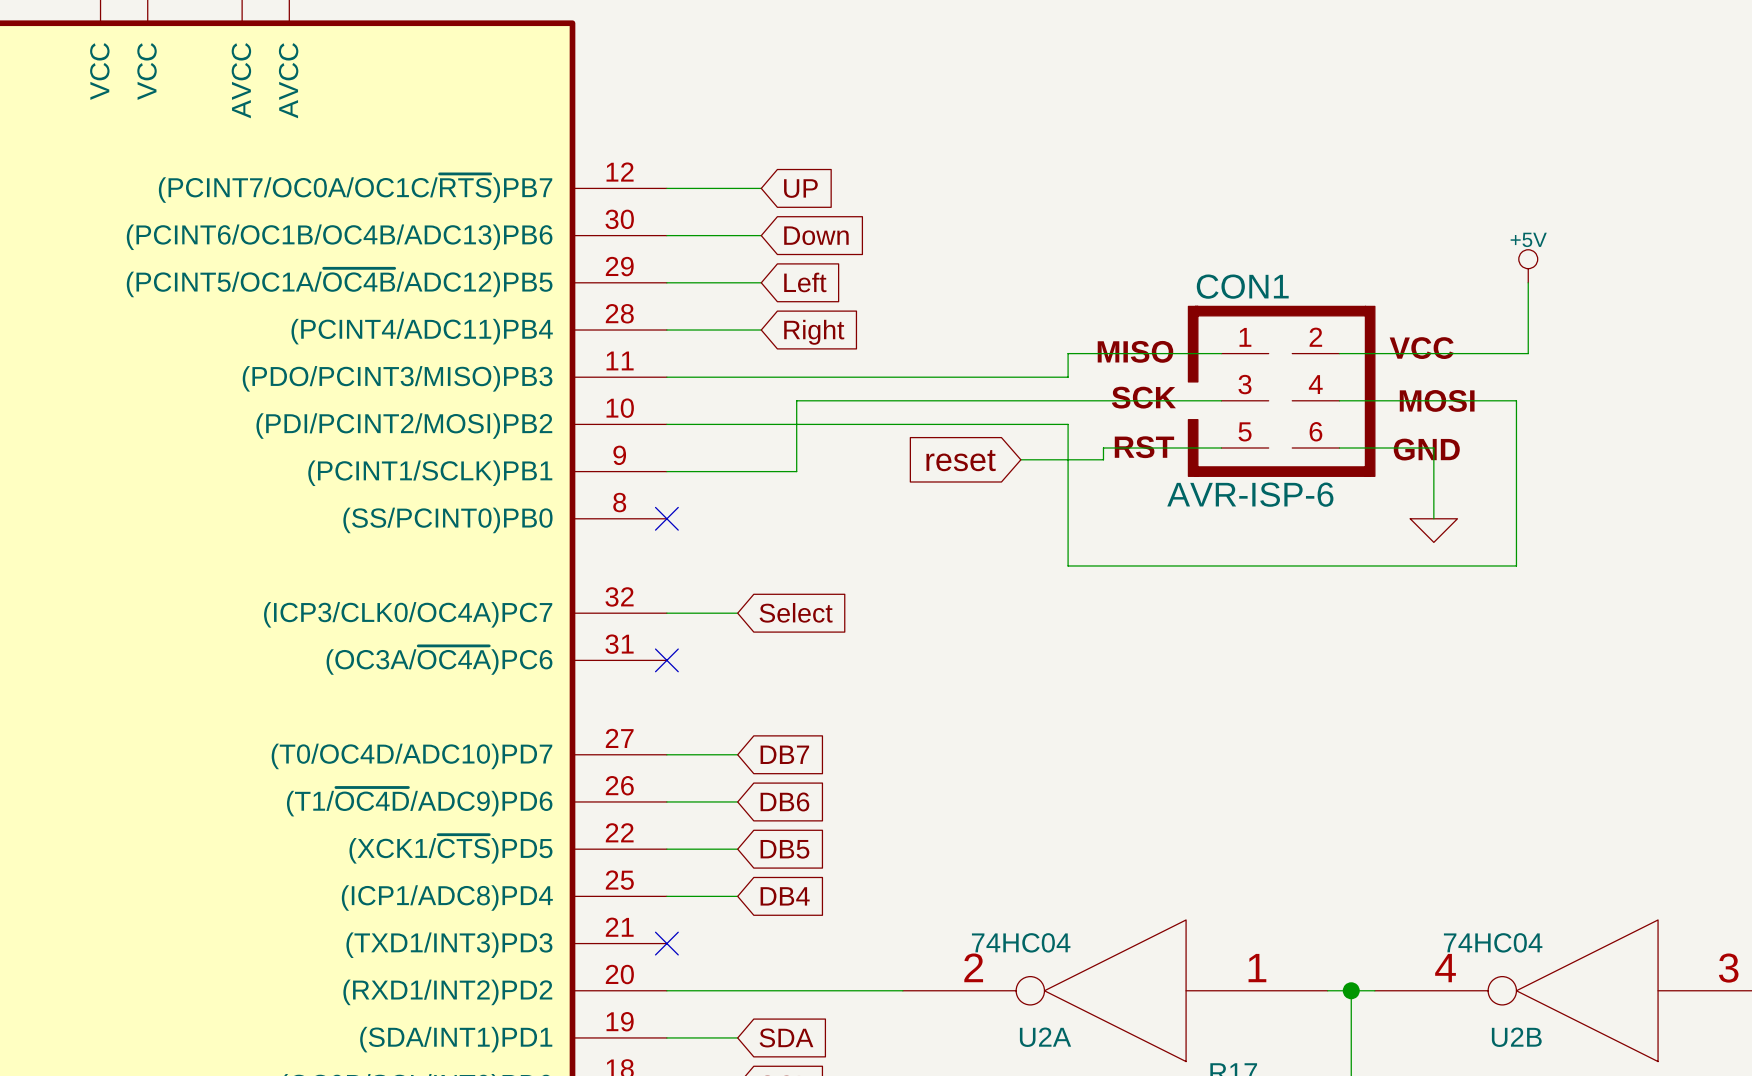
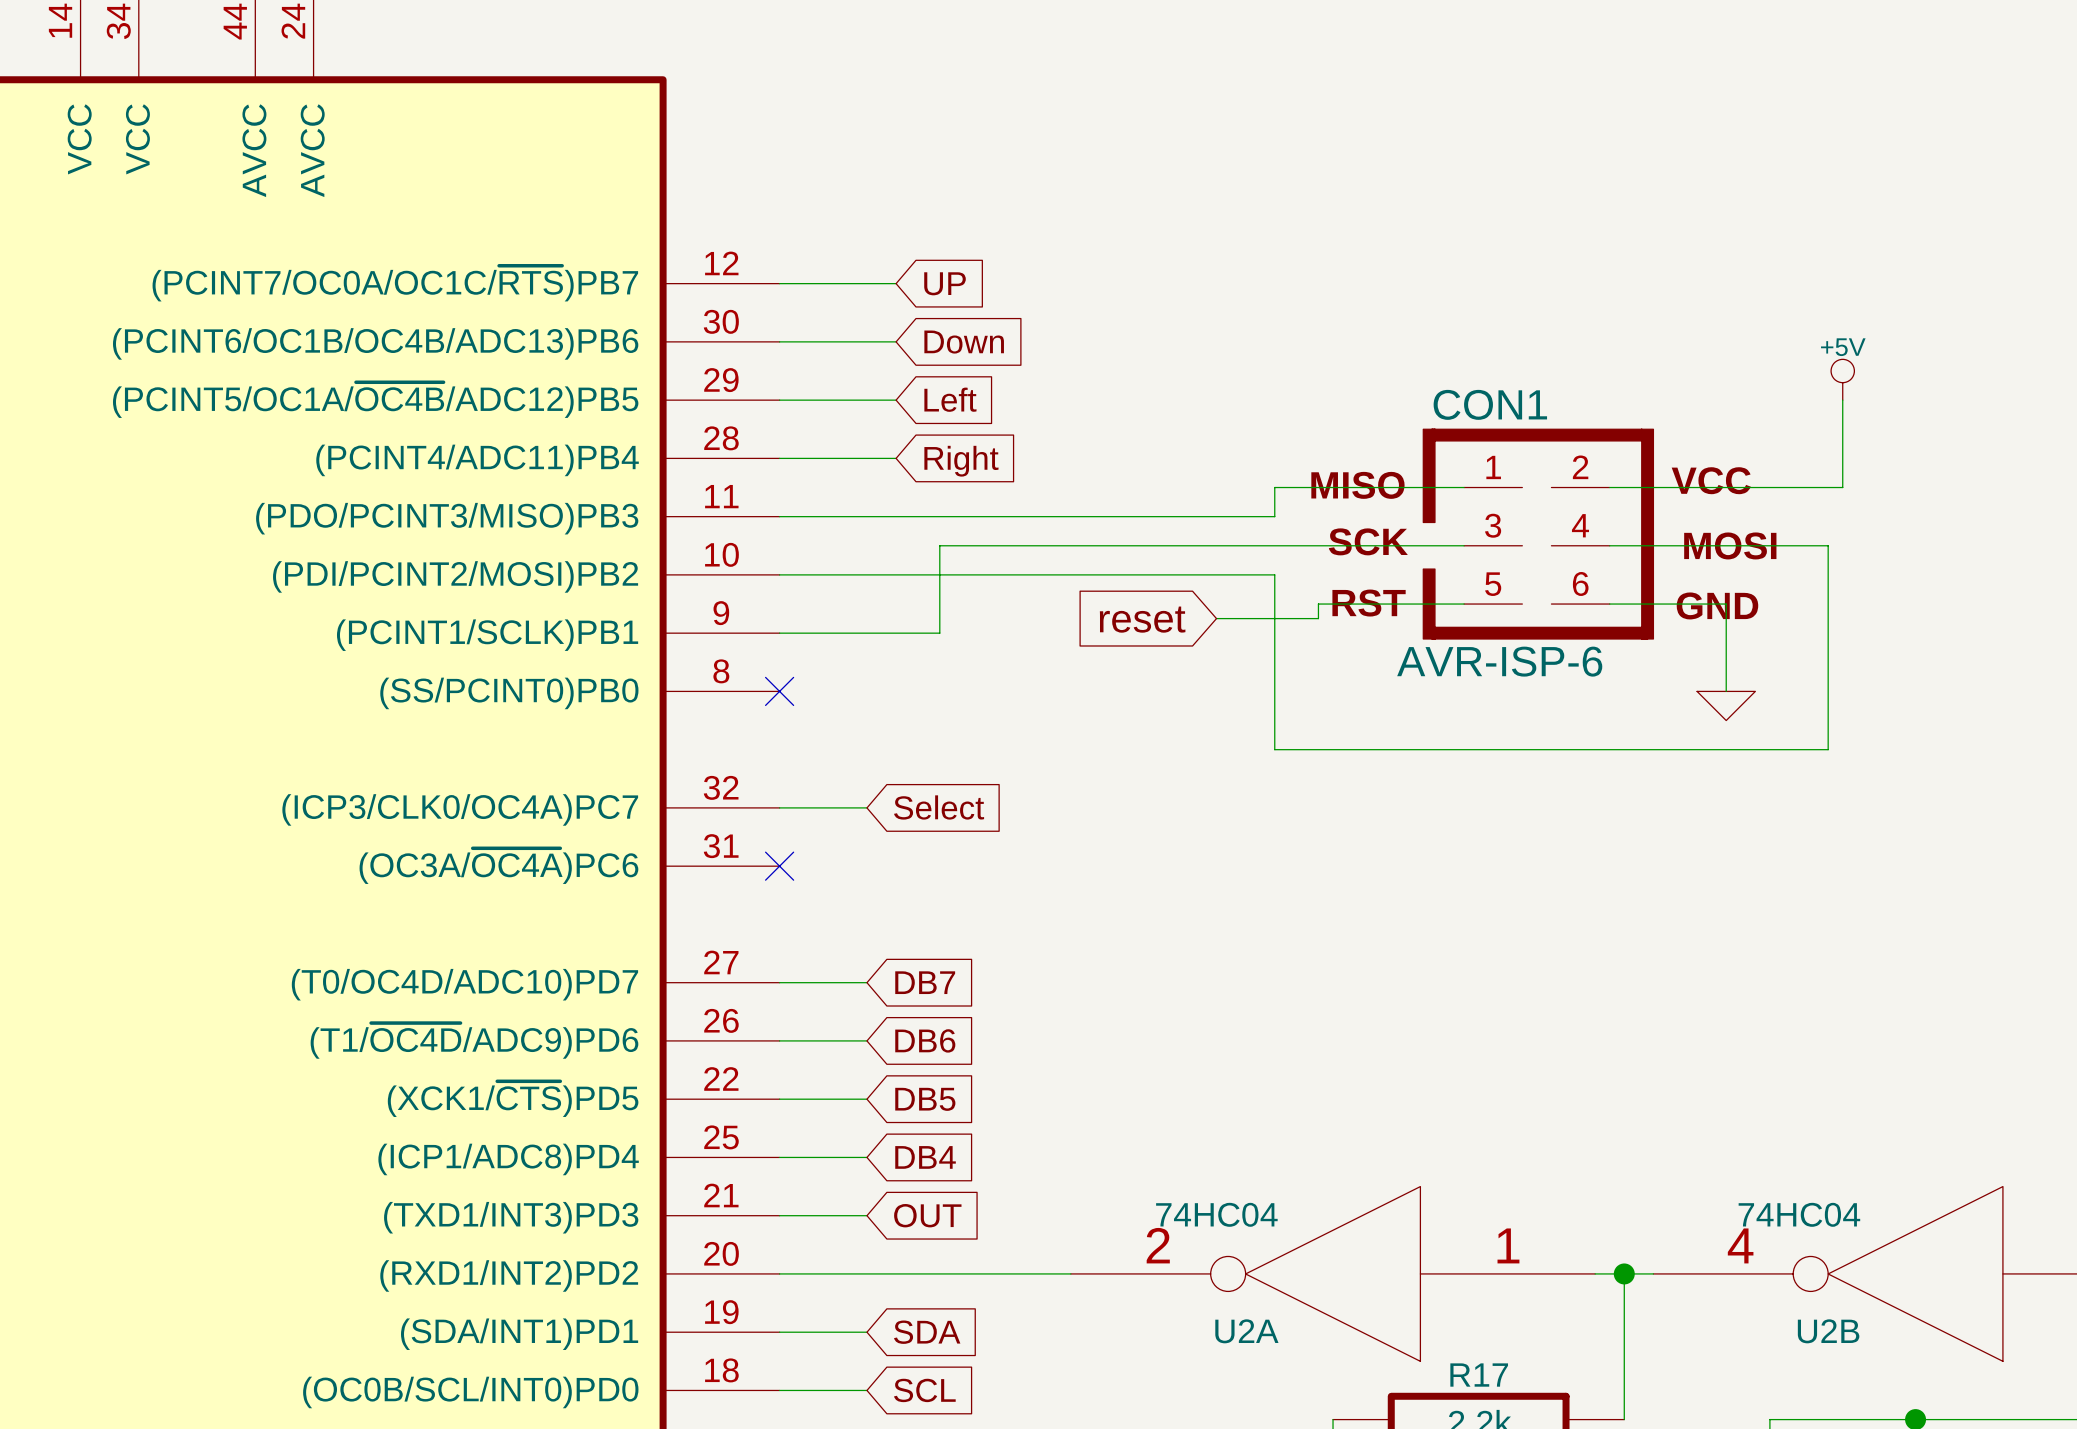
wire: none -> (779, 1215) (866, 1215)
no-connect mark: (666, 943) -> none
global label: none -> OUT (927, 1215)

